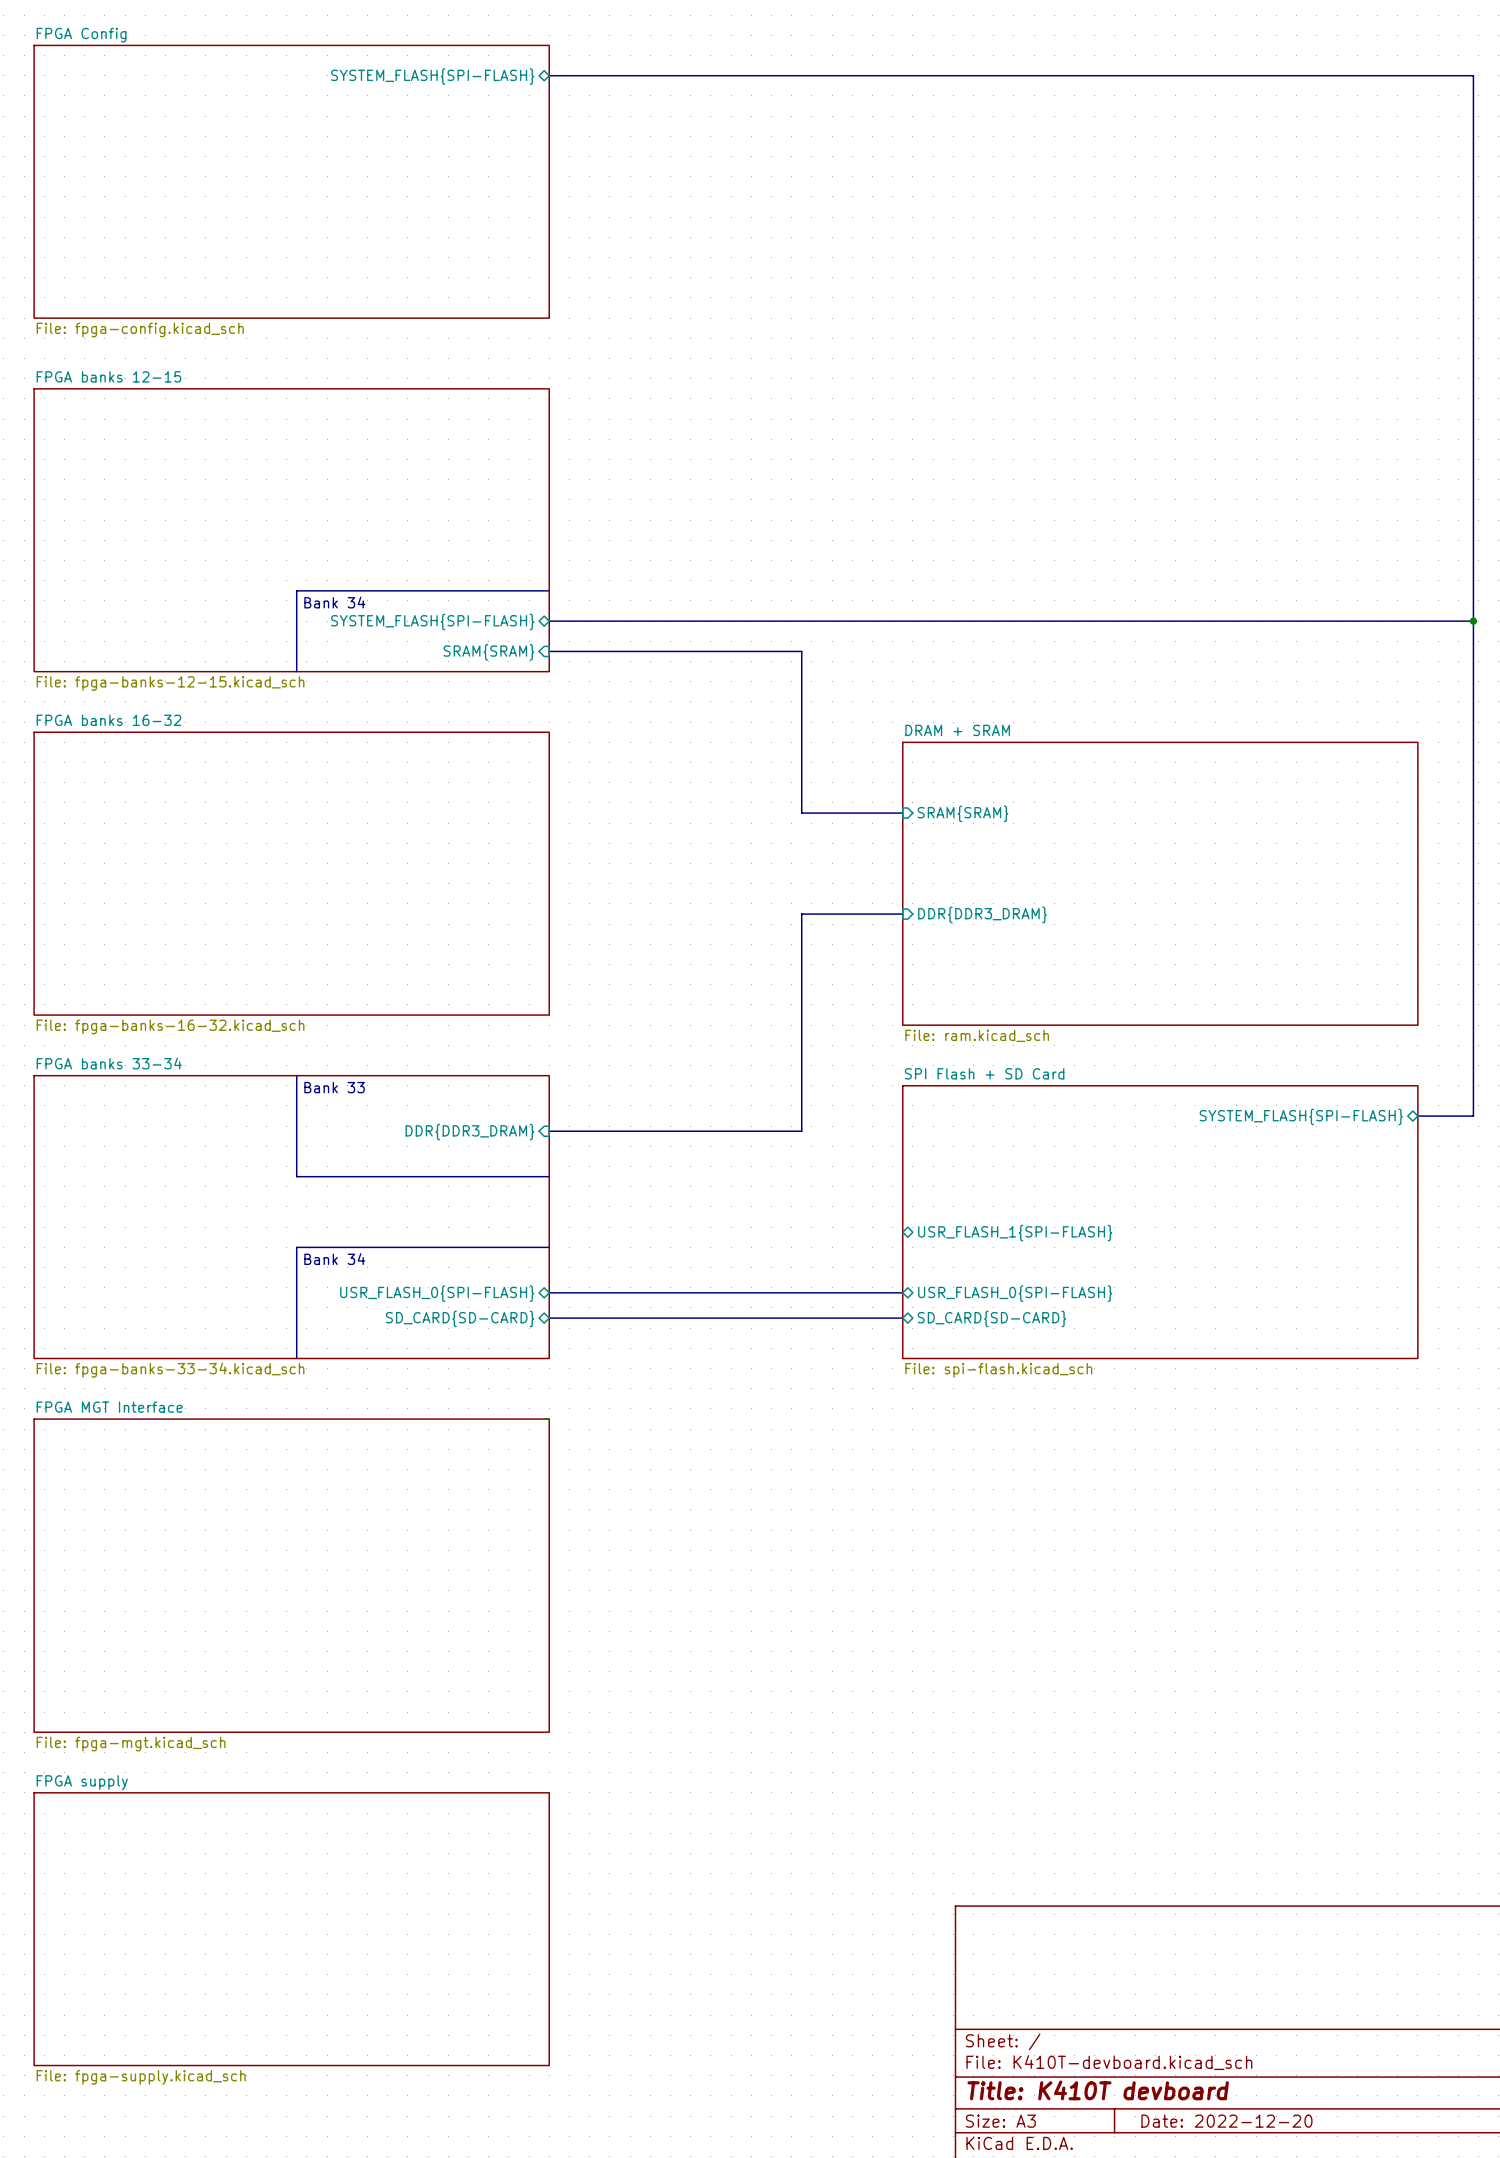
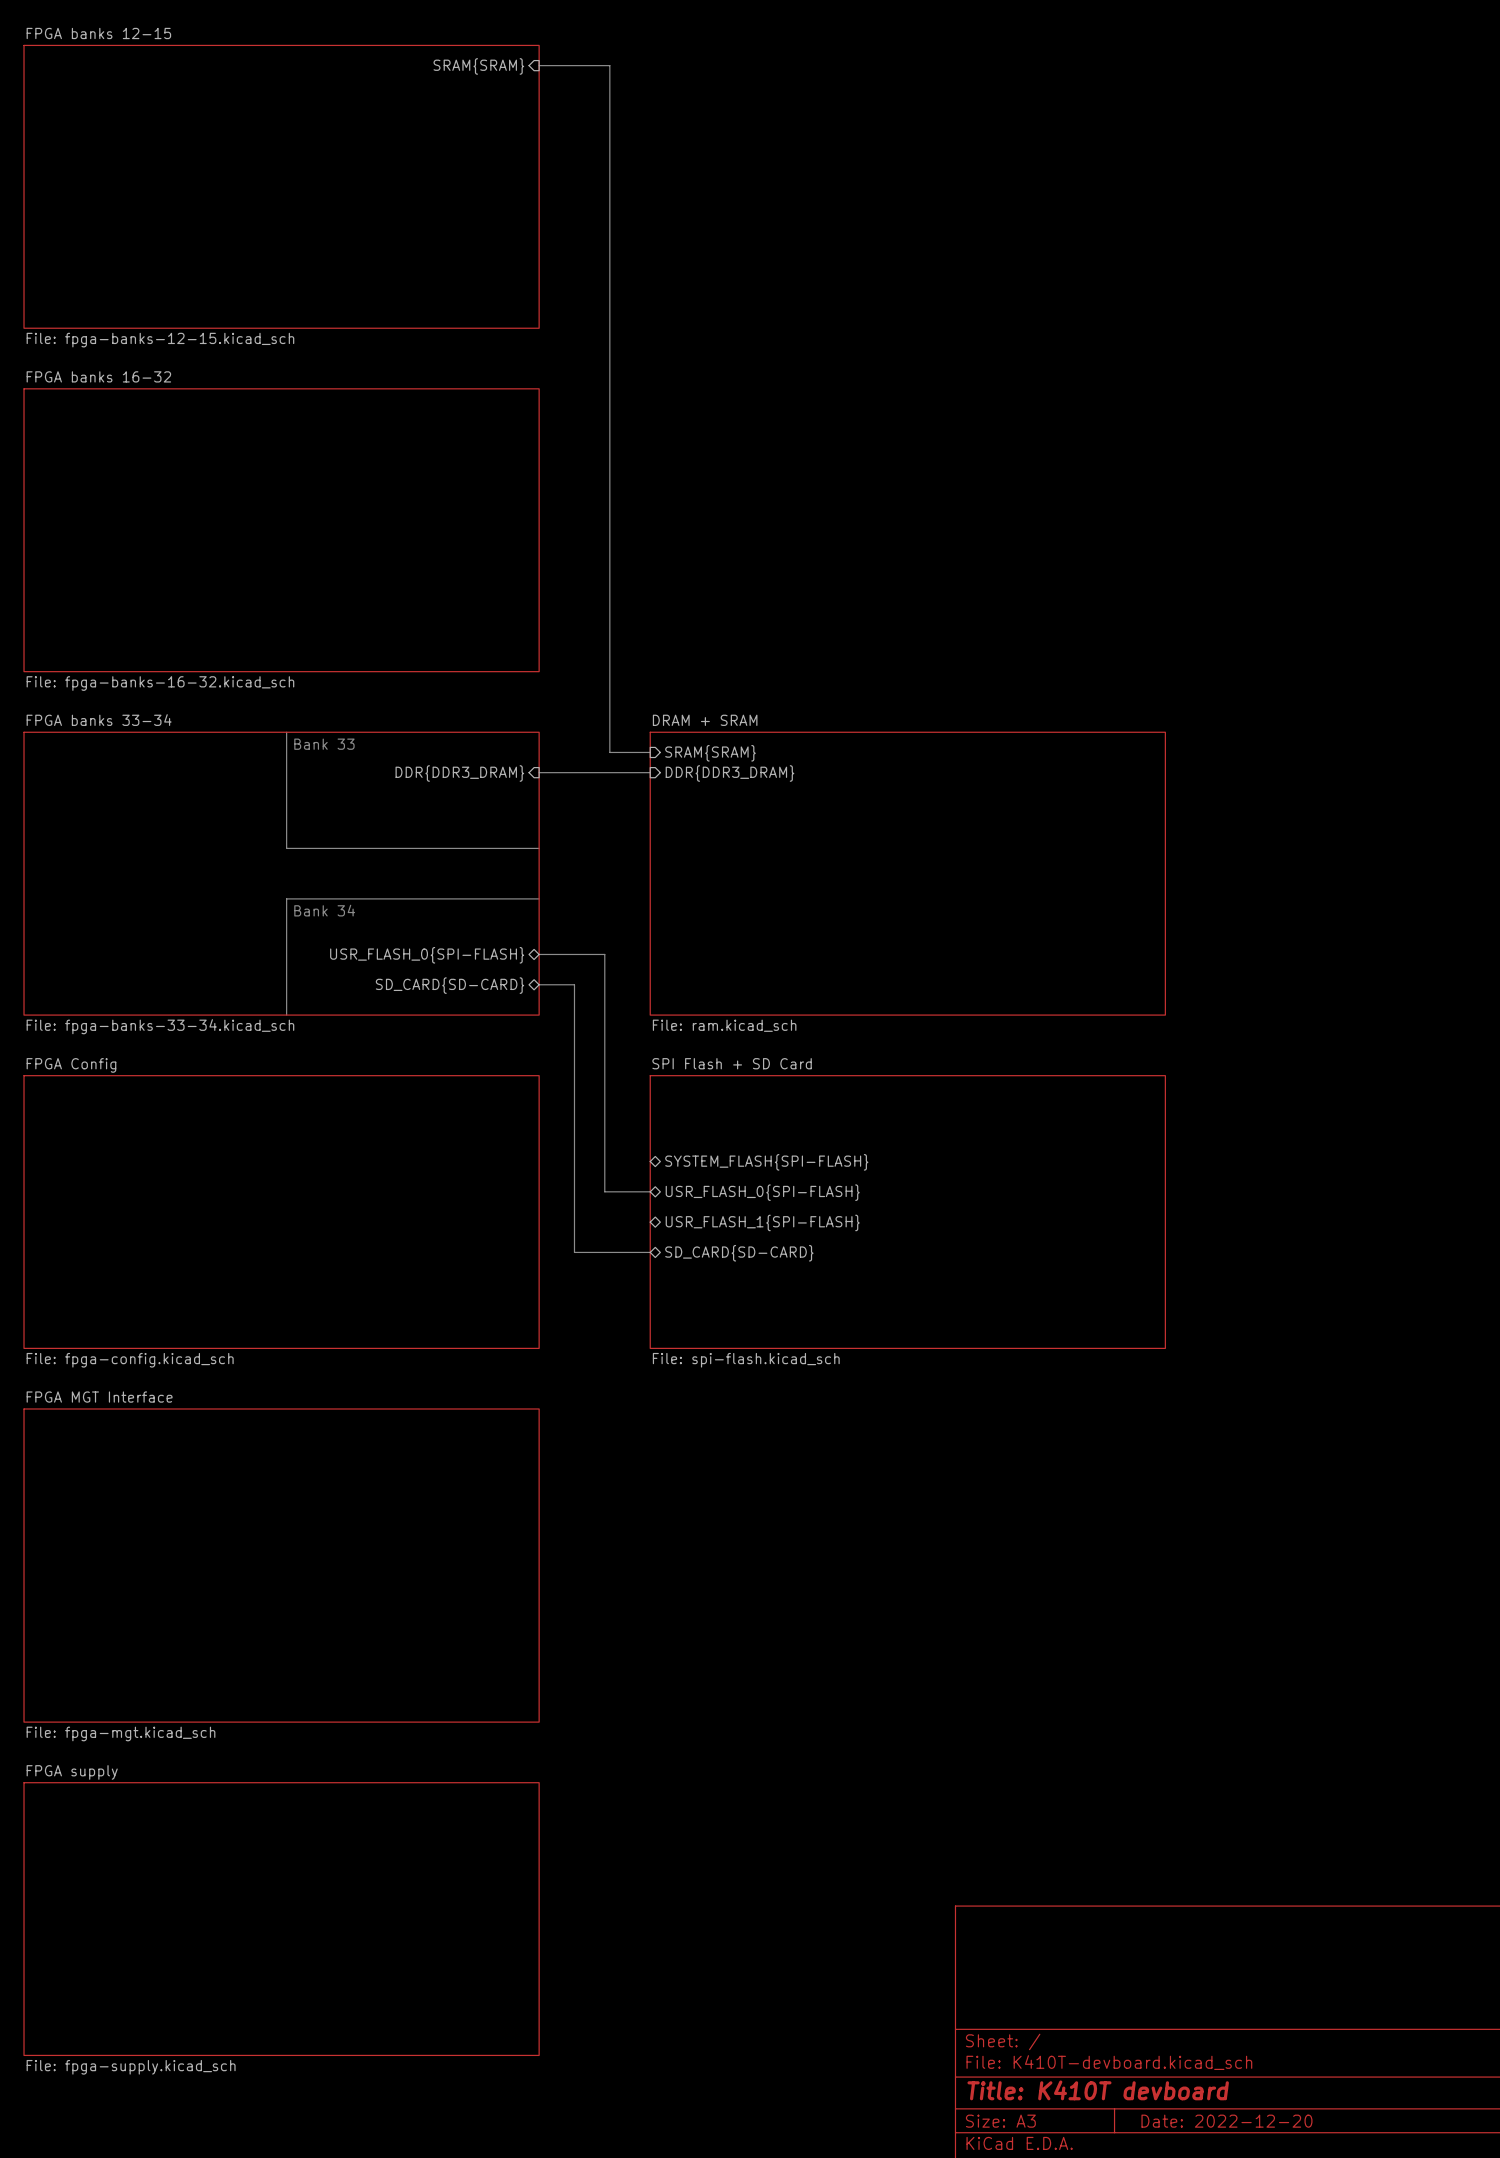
bus: none -> (539, 65) (609, 65) (609, 752) (650, 752)
sheet pin: none -> SRAM{SRAM} (478, 66)
bus: (549, 75) (1473, 75) (1473, 1116) (1417, 1116) -> none
sheet pin: SYSTEM_FLASH{SPI-FLASH} (432, 76) -> none
sheet FPGA Config: File: fpga-config.kicad_sch (291, 181) -> none
sheet FPGA banks 12-15 position: (291, 530) -> (281, 186)
line: (549, 590) (296, 590) (296, 671) -> none
text: Bank 34 (334, 602) -> none
sheet pin: SYSTEM_FLASH{SPI-FLASH} (432, 621) -> none
bus: (549, 621) (1473, 621) -> none
junction: (1473, 621) -> none
bus: (549, 651) (801, 651) (801, 813) (902, 813) -> none
sheet pin: SRAM{SRAM} (488, 652) -> none
line: none -> (286, 732) (286, 848) (539, 848)
text: none -> Bank 33 (324, 744)
sheet pin: none -> SRAM{SRAM} (710, 753)
bus: none -> (539, 772) (650, 772)
sheet pin: none -> DDR{DDR3_DRAM} (459, 773)
sheet pin: none -> DDR{DDR3_DRAM} (729, 773)
sheet pin: SRAM{SRAM} (963, 813) -> none
sheet FPGA banks 16-32 position: (291, 873) -> (281, 530)
sheet DRAM + SRAM: none -> File: ram.kicad_sch (907, 873)
sheet DRAM + SRAM: File: ram.kicad_sch (1160, 883) -> none
line: none -> (539, 898) (286, 898) (286, 1015)
text: none -> Bank 34 (324, 910)
bus: (902, 914) (801, 914) (801, 1131) (549, 1131) -> none
sheet pin: DDR{DDR3_DRAM} (982, 914) -> none
bus: none -> (539, 954) (604, 954) (604, 1191) (650, 1191)
sheet pin: none -> USR_FLASH_0{SPI-FLASH} (427, 955)
bus: none -> (539, 984) (574, 984) (574, 1252) (650, 1252)
sheet pin: none -> SD_CARD{SD-CARD} (449, 985)
line: (296, 1075) (296, 1176) (549, 1176) -> none
text: Bank 33 (334, 1087) -> none
sheet pin: SYSTEM_FLASH{SPI-FLASH} (1301, 1116) -> none
sheet pin: DDR{DDR3_DRAM} (469, 1132) -> none
sheet pin: none -> SYSTEM_FLASH{SPI-FLASH} (766, 1162)
sheet pin: none -> USR_FLASH_0{SPI-FLASH} (762, 1192)
sheet FPGA Config: none -> File: fpga-config.kicad_sch (281, 1212)
sheet SPI Flash + SD Card: none -> File: spi-flash.kicad_sch (907, 1212)
sheet FPGA banks 33-34 position: (291, 1217) -> (281, 873)
sheet pin: none -> USR_FLASH_1{SPI-FLASH} (762, 1222)
sheet SPI Flash + SD Card: File: spi-flash.kicad_sch (1160, 1222) -> none
sheet pin: USR_FLASH_1{SPI-FLASH} (1015, 1233) -> none
line: (549, 1247) (296, 1247) (296, 1358) -> none
sheet pin: none -> SD_CARD{SD-CARD} (739, 1253)
text: Bank 34 (334, 1259) -> none
bus: (549, 1292) (902, 1292) -> none
sheet pin: USR_FLASH_0{SPI-FLASH} (437, 1293) -> none
sheet pin: USR_FLASH_0{SPI-FLASH} (1015, 1293) -> none
sheet pin: SD_CARD{SD-CARD} (460, 1318) -> none
bus: (549, 1318) (902, 1318) -> none
sheet pin: SD_CARD{SD-CARD} (991, 1318) -> none
wire: (544, 1419) (549, 1419) -> none
sheet FPGA MGT Interface position: (291, 1575) -> (281, 1565)
sheet FPGA supply position: (291, 1929) -> (281, 1919)

